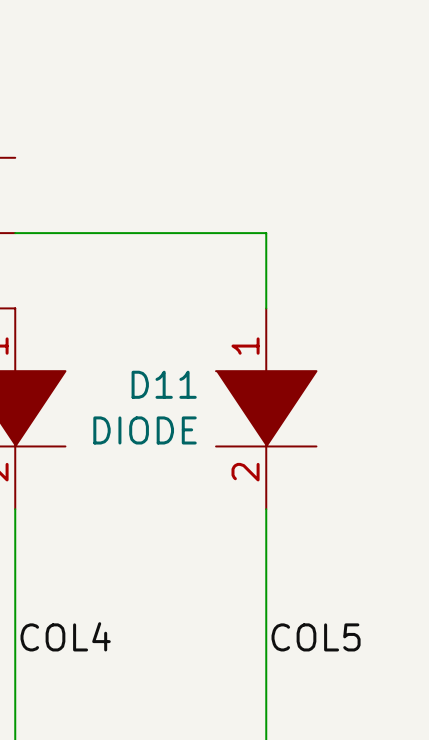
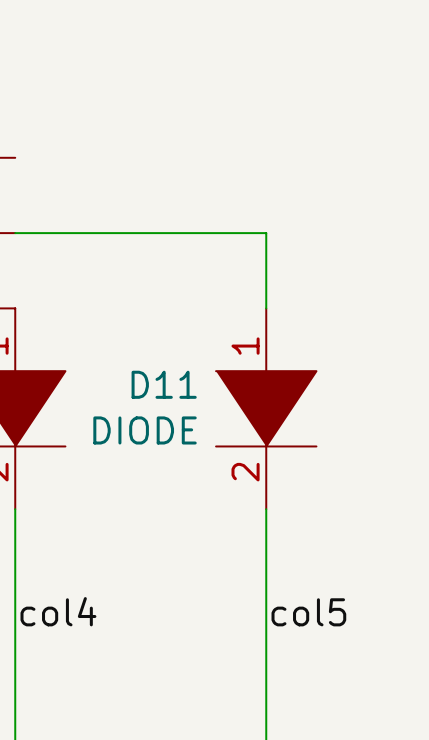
label: none -> col4 (58, 611)
label: none -> col5 (308, 612)
label: COL4 (65, 636) -> none
label: COL5 (316, 637) -> none

